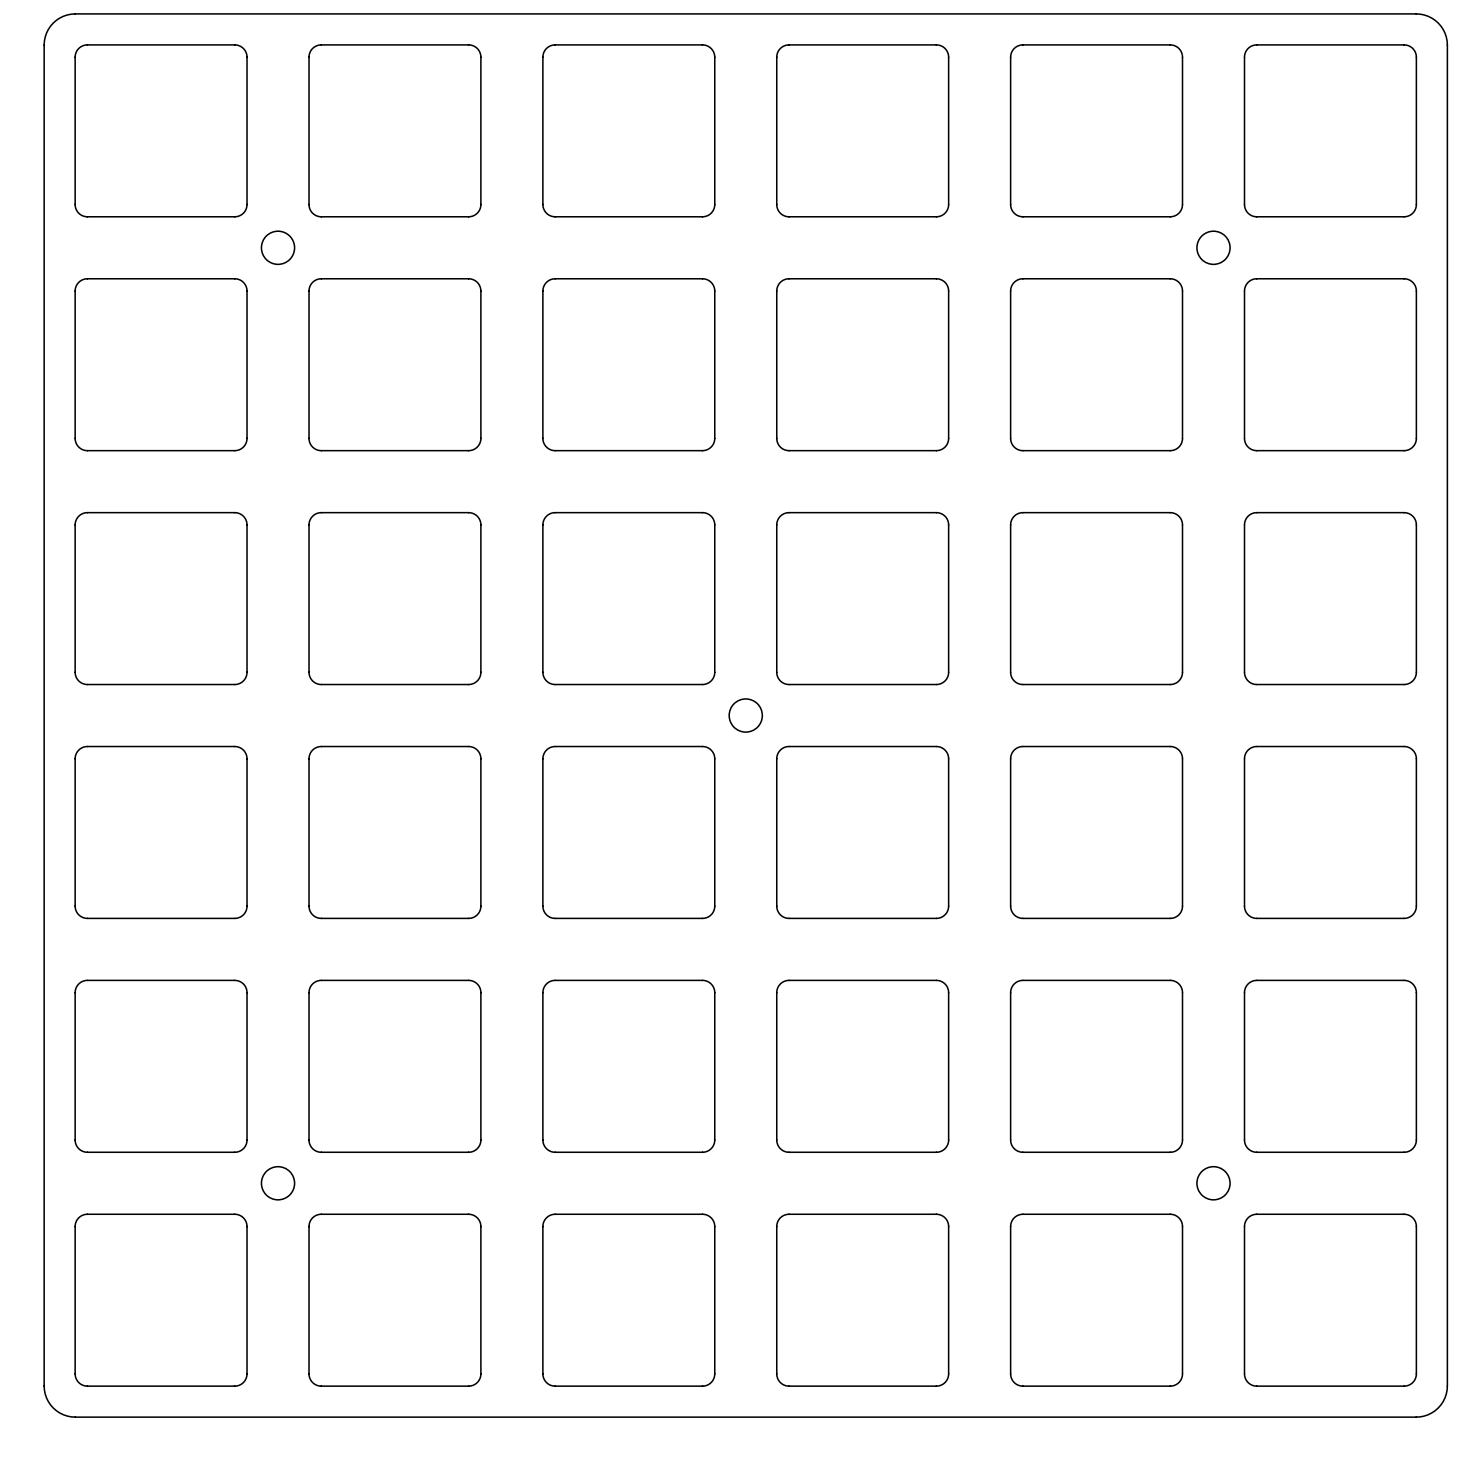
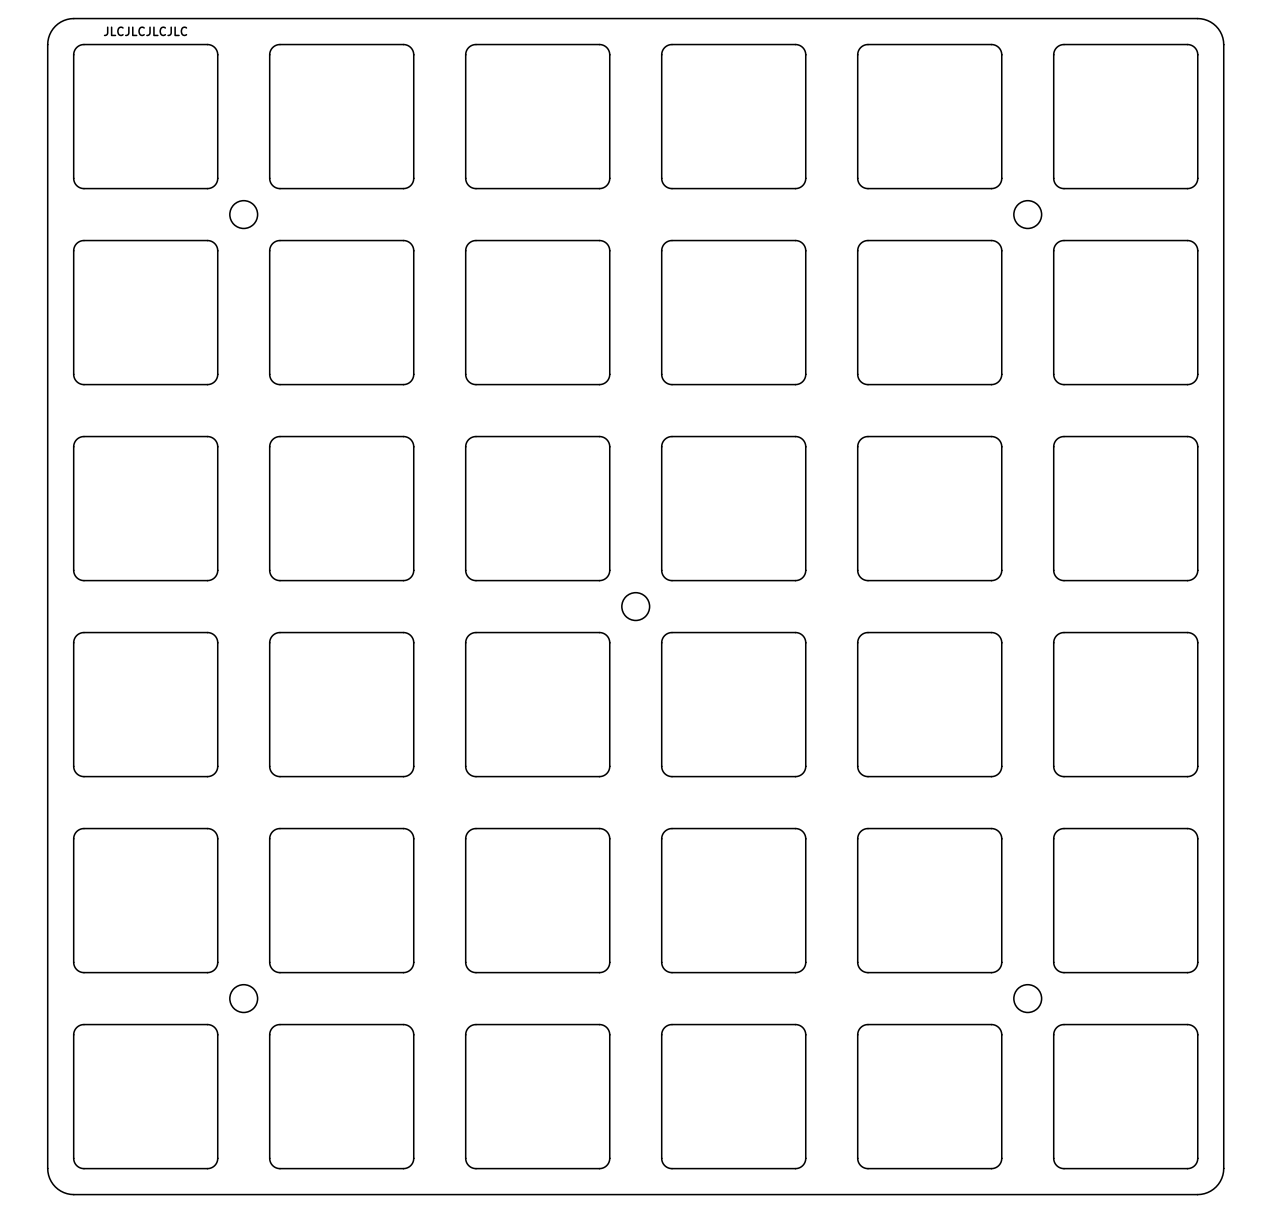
drawing: none -> [103, 26, 188, 37]

